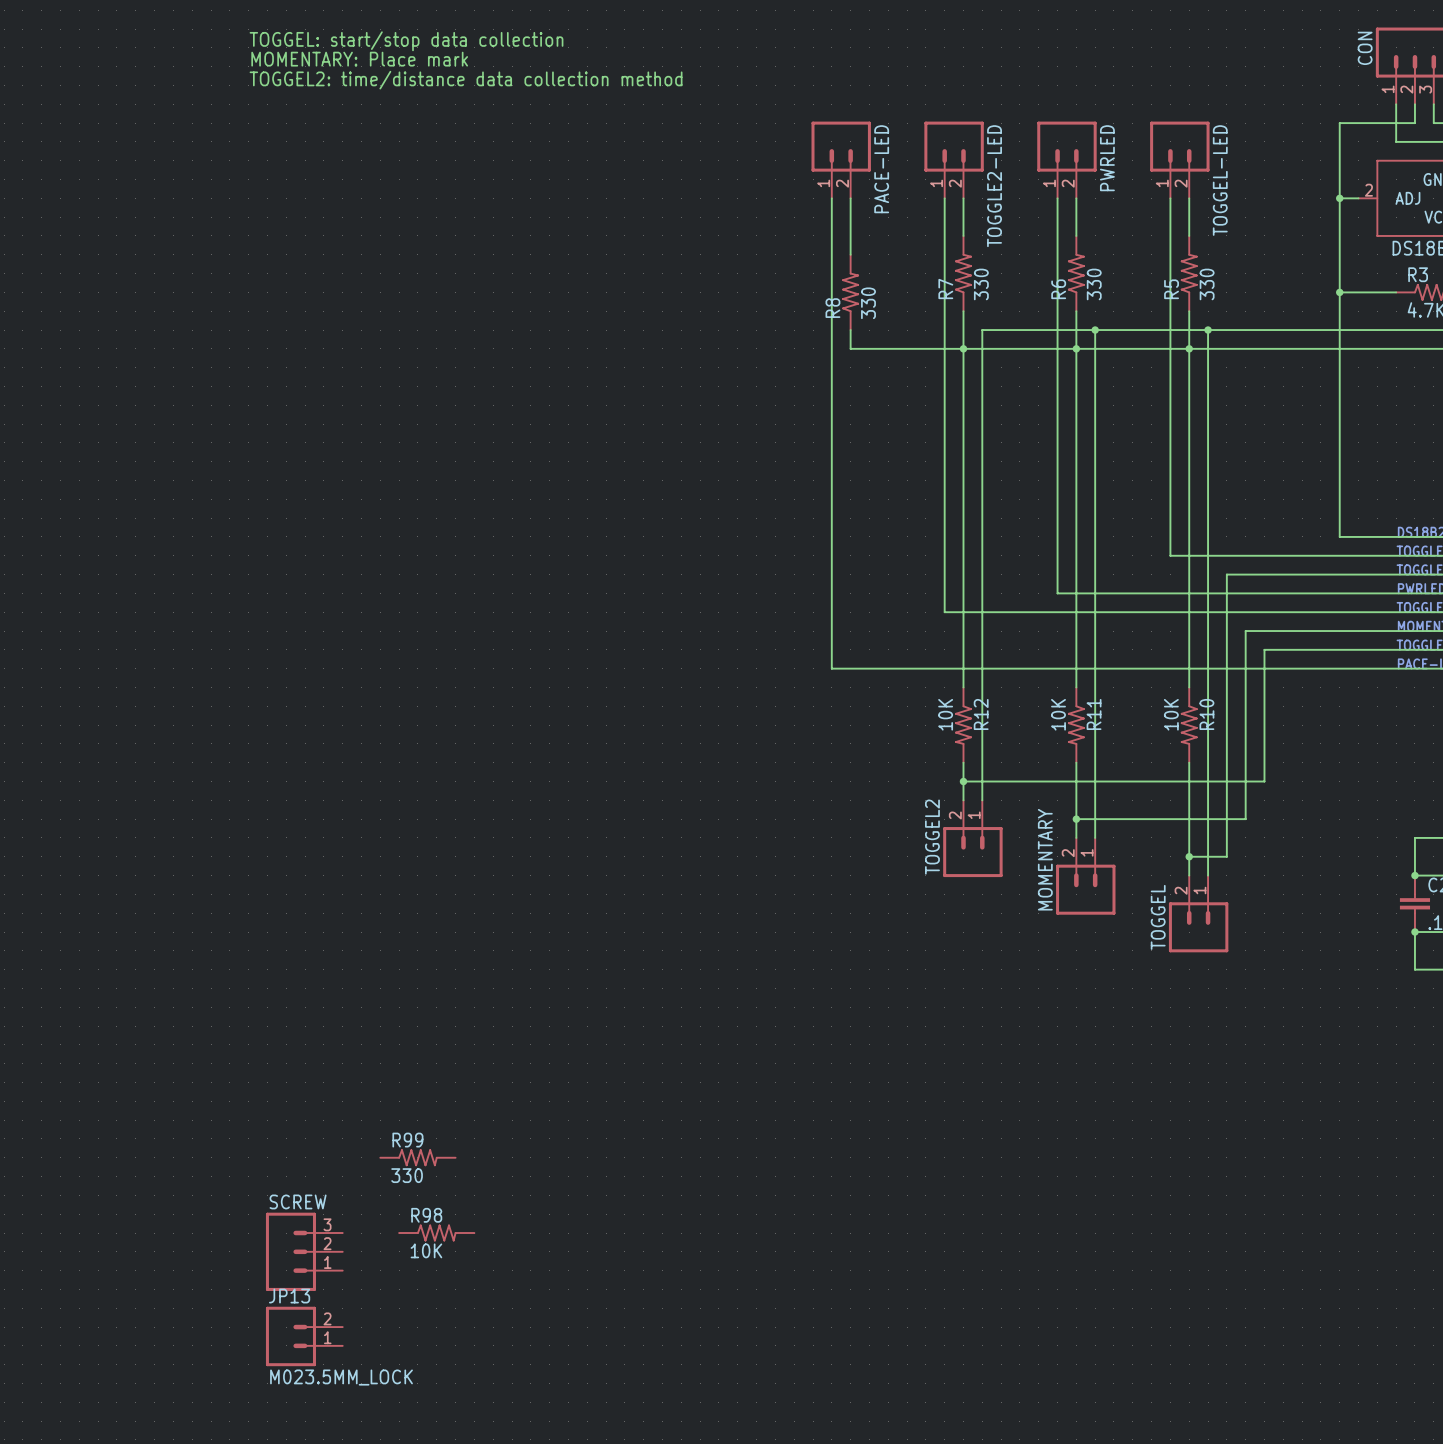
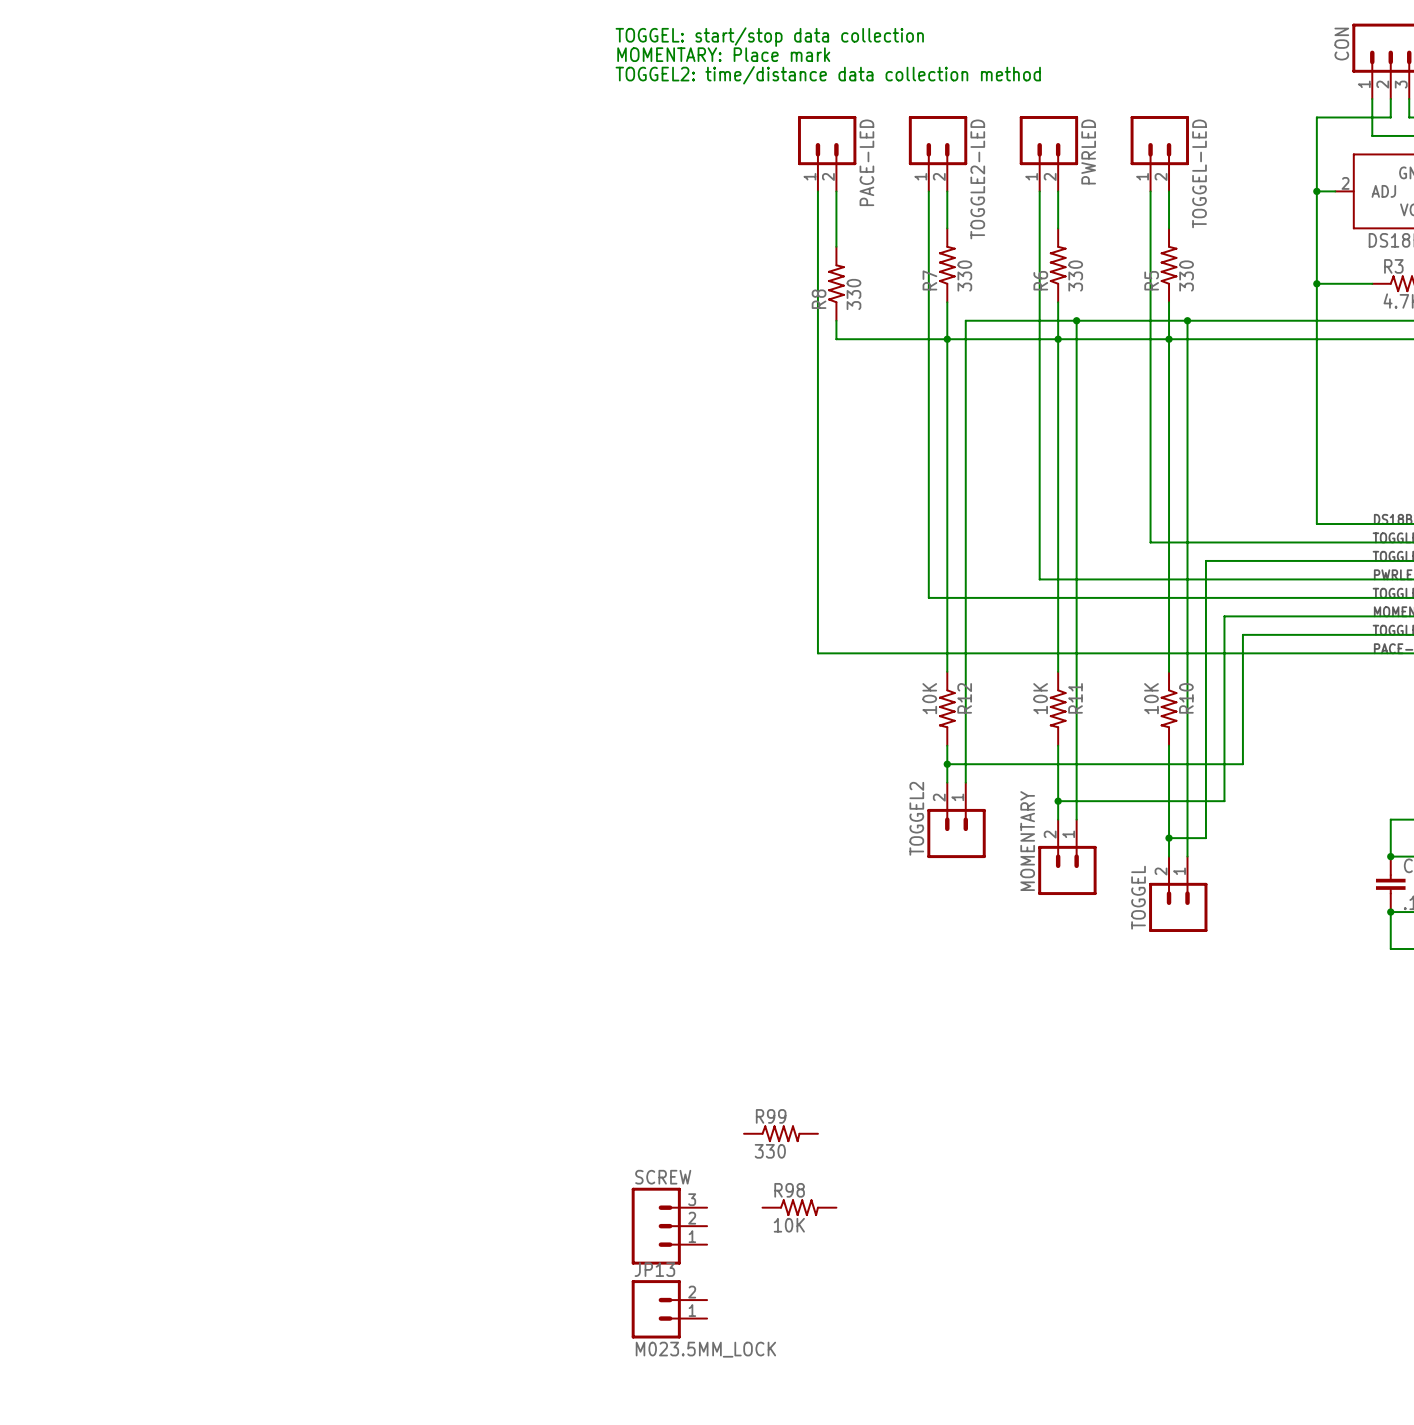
text: TOGGEL: start/stop data collection (406, 41) -> none
text: none -> TOGGEL: start/stop data collection (769, 37)
text: MOMENTARY: Place mark (359, 59) -> none
text: none -> MOMENTARY: Place mark (723, 54)
text: TOGGEL2: time/distance data collection method (466, 80) -> none
text: none -> TOGGEL2: time/distance data collection method (828, 75)
R99 position: (417, 1157) -> (780, 1133)
R98 position: (436, 1233) -> (799, 1207)
SCREW: (304, 1251) -> none
SCREW: none -> (669, 1226)
JP13 position: (304, 1336) -> (669, 1309)

